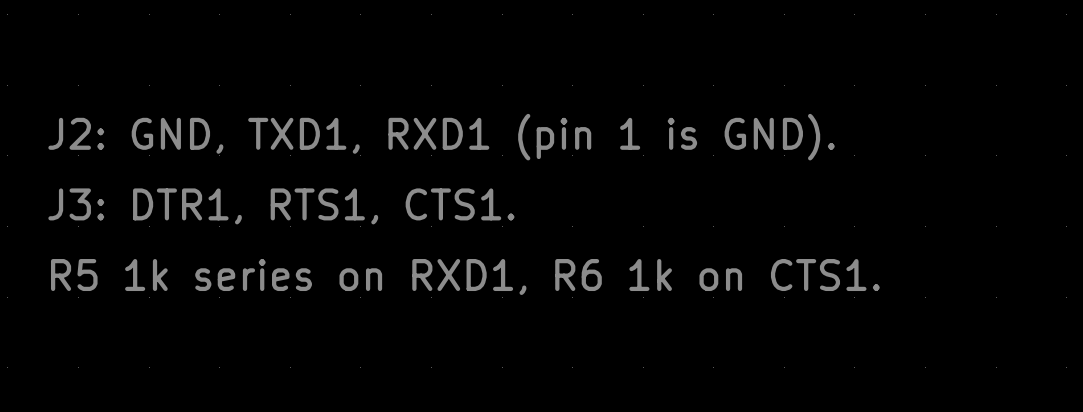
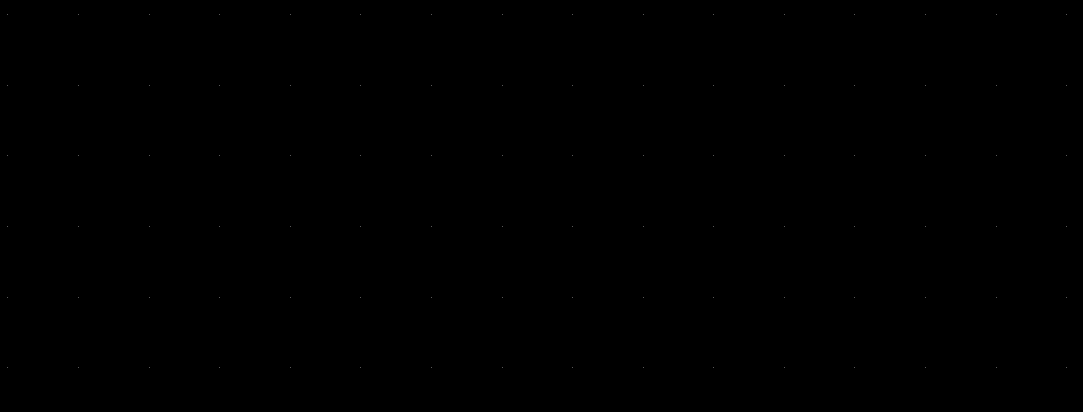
text: J2: GND, TXD1, RXD1 (pin 1 is GND). (441, 137) -> none
text: J3: DTR1, RTS1, CTS1. (281, 206) -> none
text: R5 1k series on RXD1, R6 1k on CTS1. (465, 276) -> none

